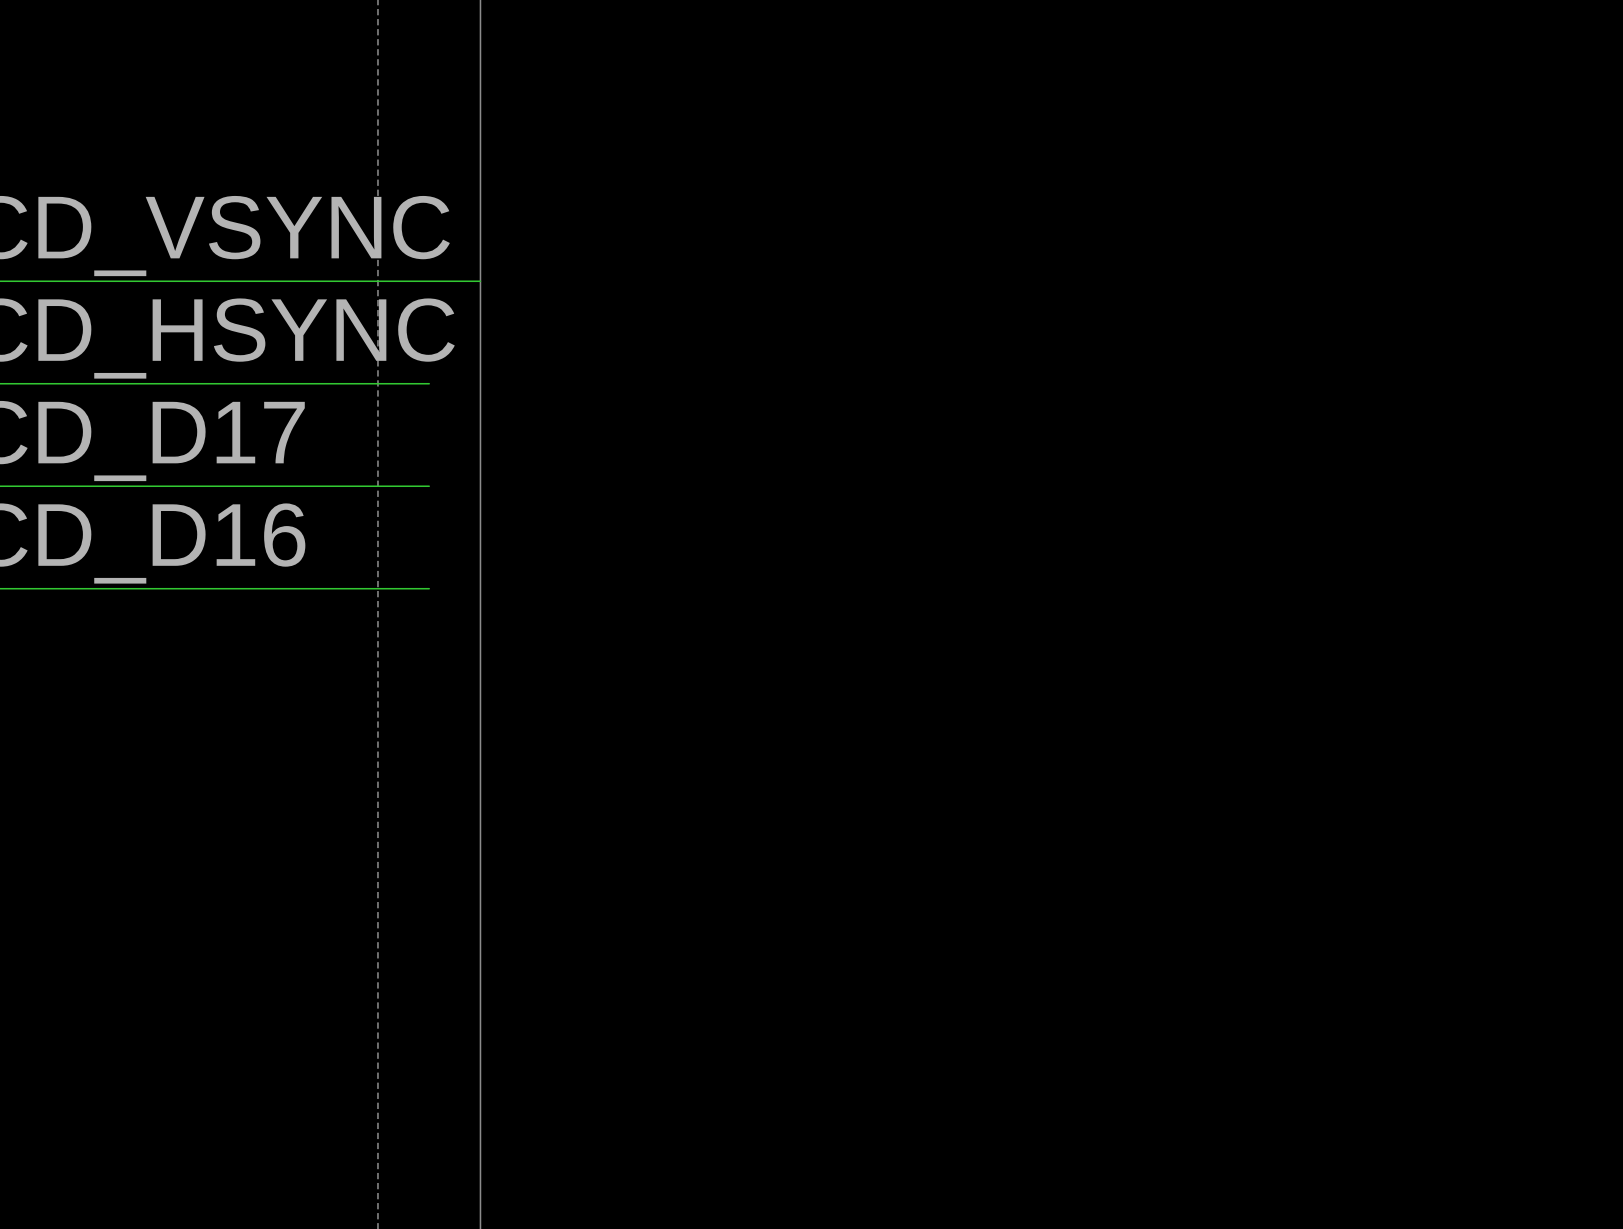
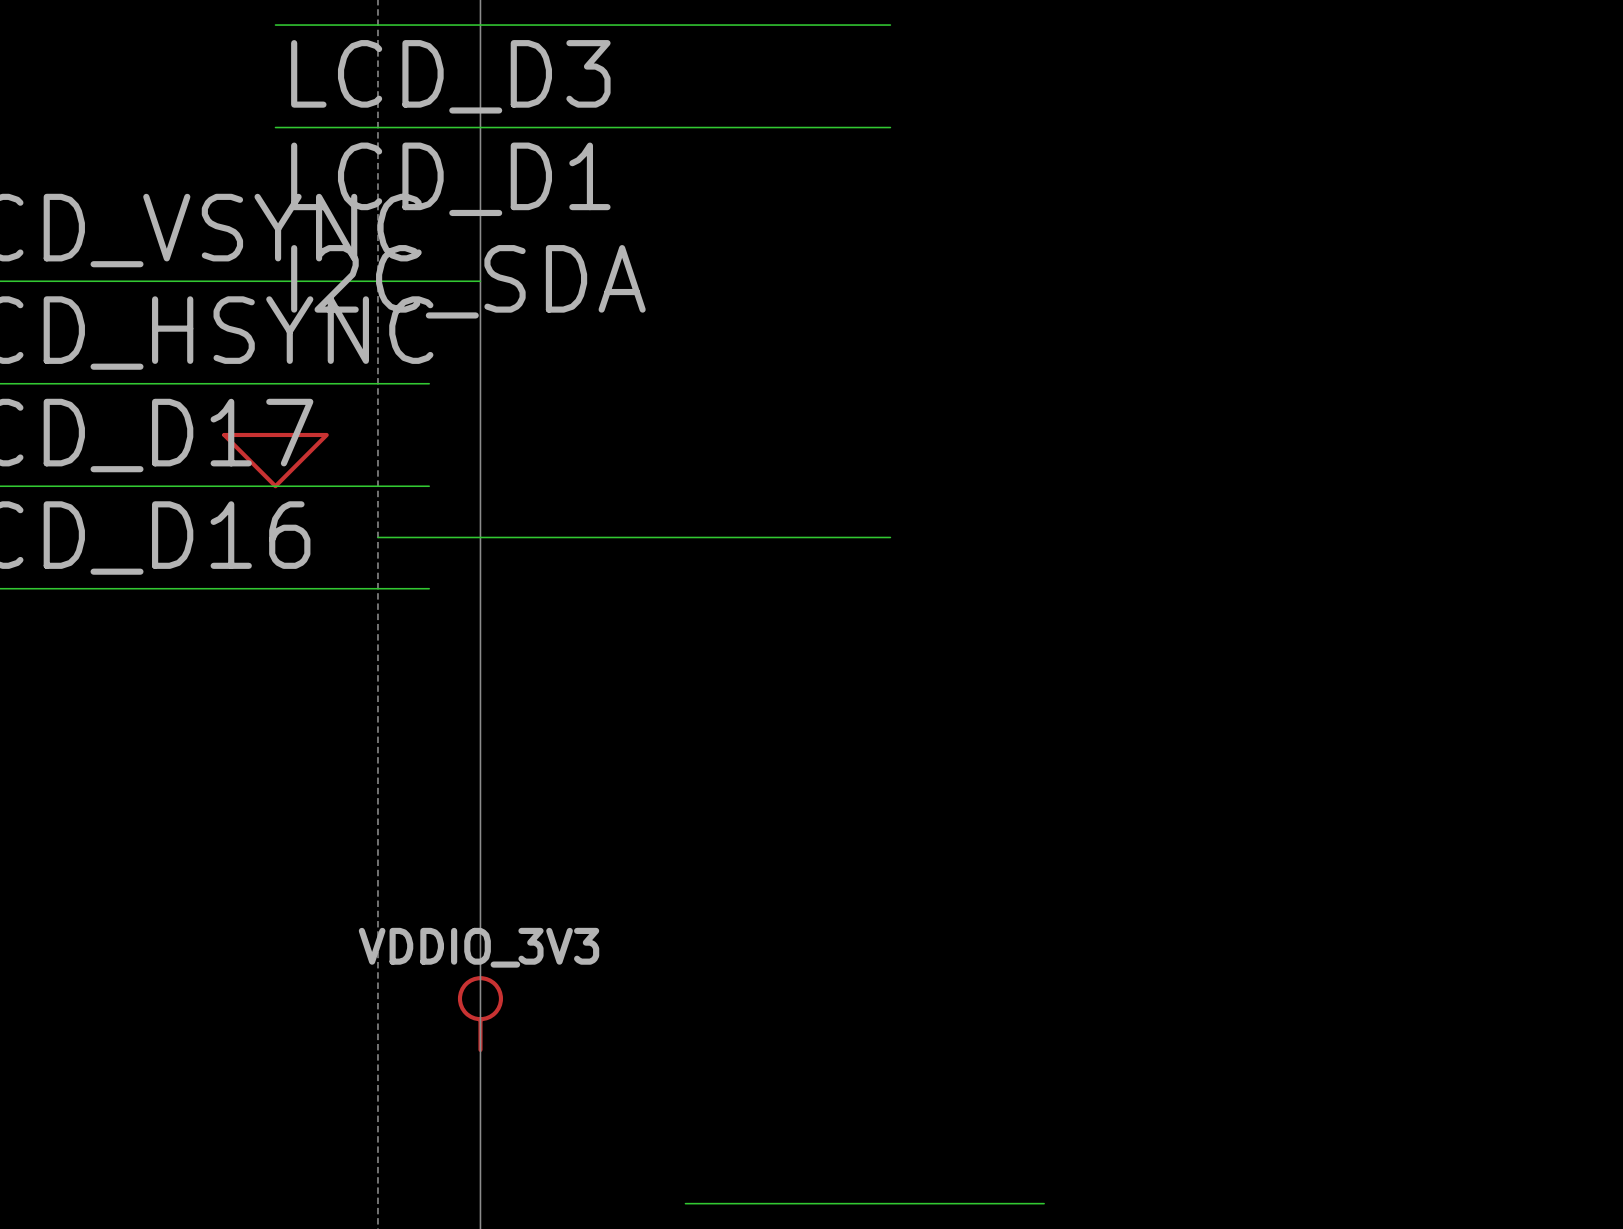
wire: none -> (275, 25) (890, 25)
label: none -> LCD_D3 (450, 76)
wire: none -> (275, 127) (890, 127)
label: none -> LCD_D1 (450, 179)
label: none -> I2C_SDA (468, 281)
power symbol: none -> (275, 460)
wire: none -> (377, 537) (890, 537)
power symbol: none -> VDDIO_3V3 (480, 1014)
wire: none -> (685, 1203) (1044, 1203)

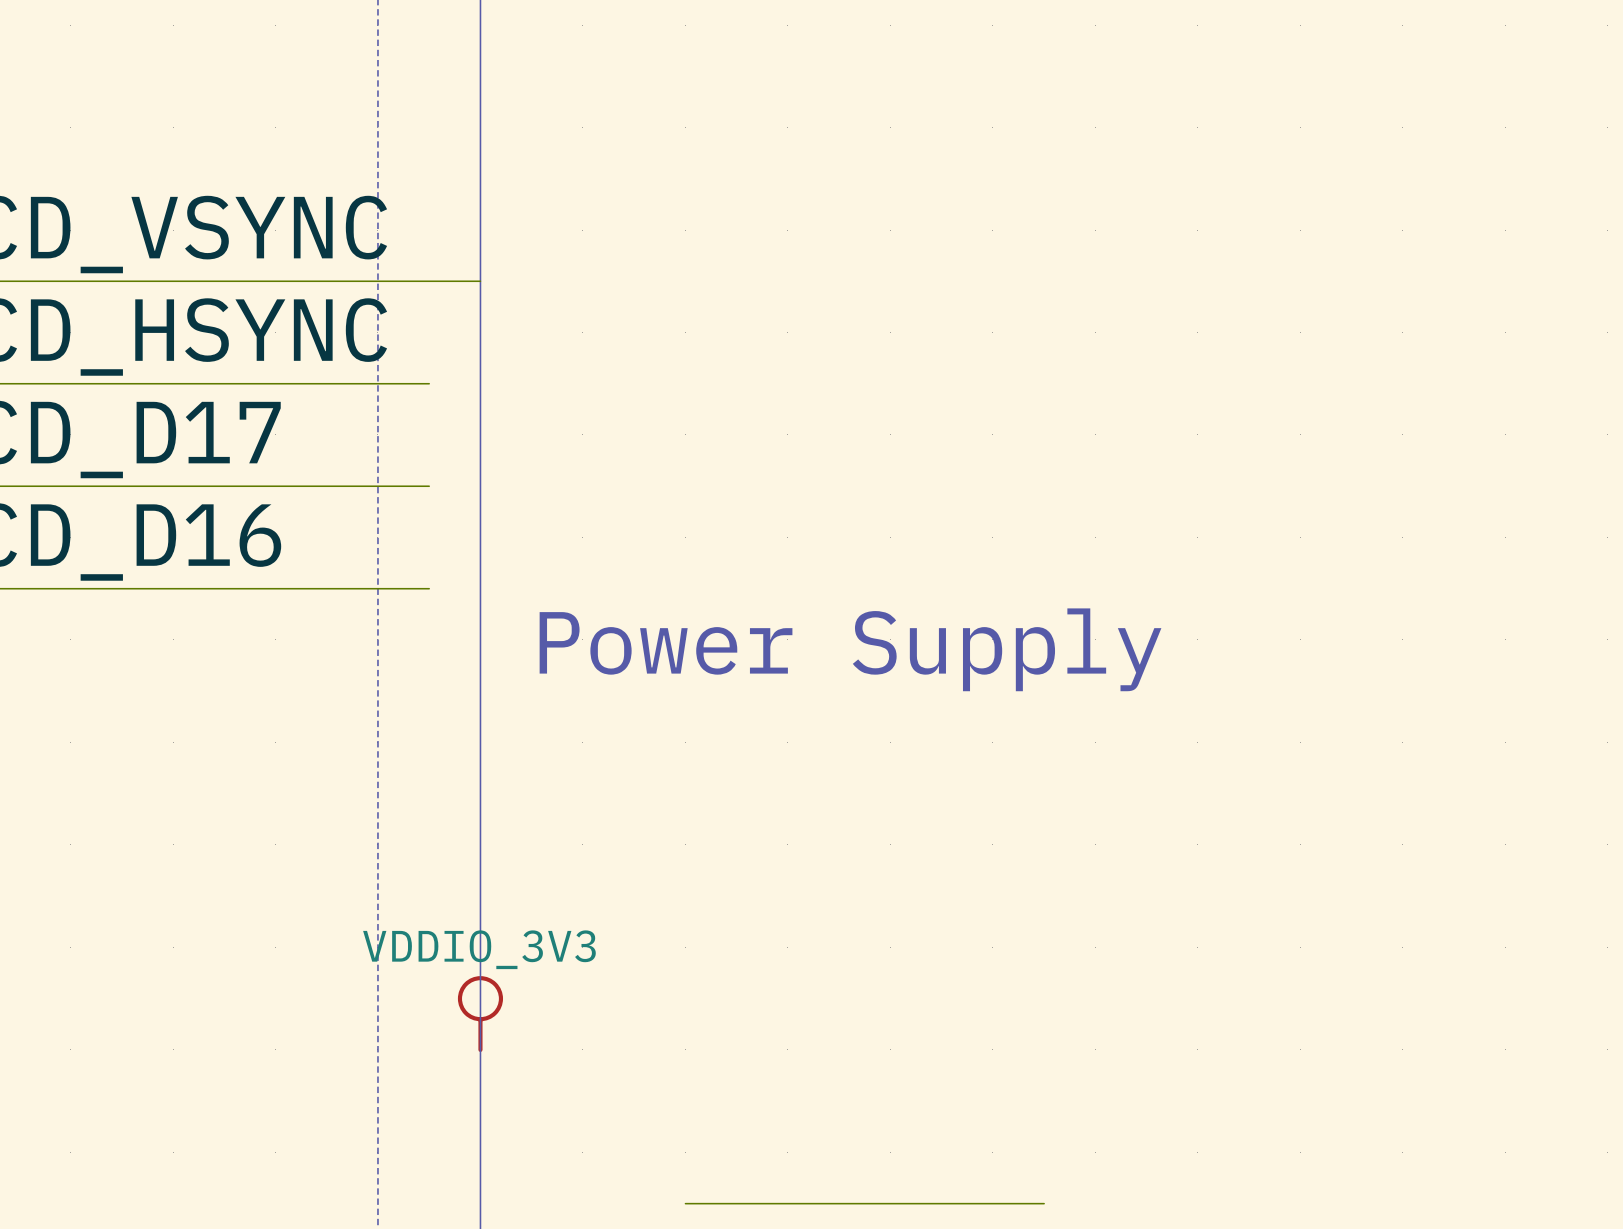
wire: (275, 25) (890, 25) -> none
label: LCD_D3 (450, 76) -> none
wire: (275, 127) (890, 127) -> none
label: LCD_D1 (450, 179) -> none
label: I2C_SDA (468, 281) -> none
power symbol: (275, 460) -> none
wire: (377, 537) (890, 537) -> none
text: none -> Power Supply (850, 649)

